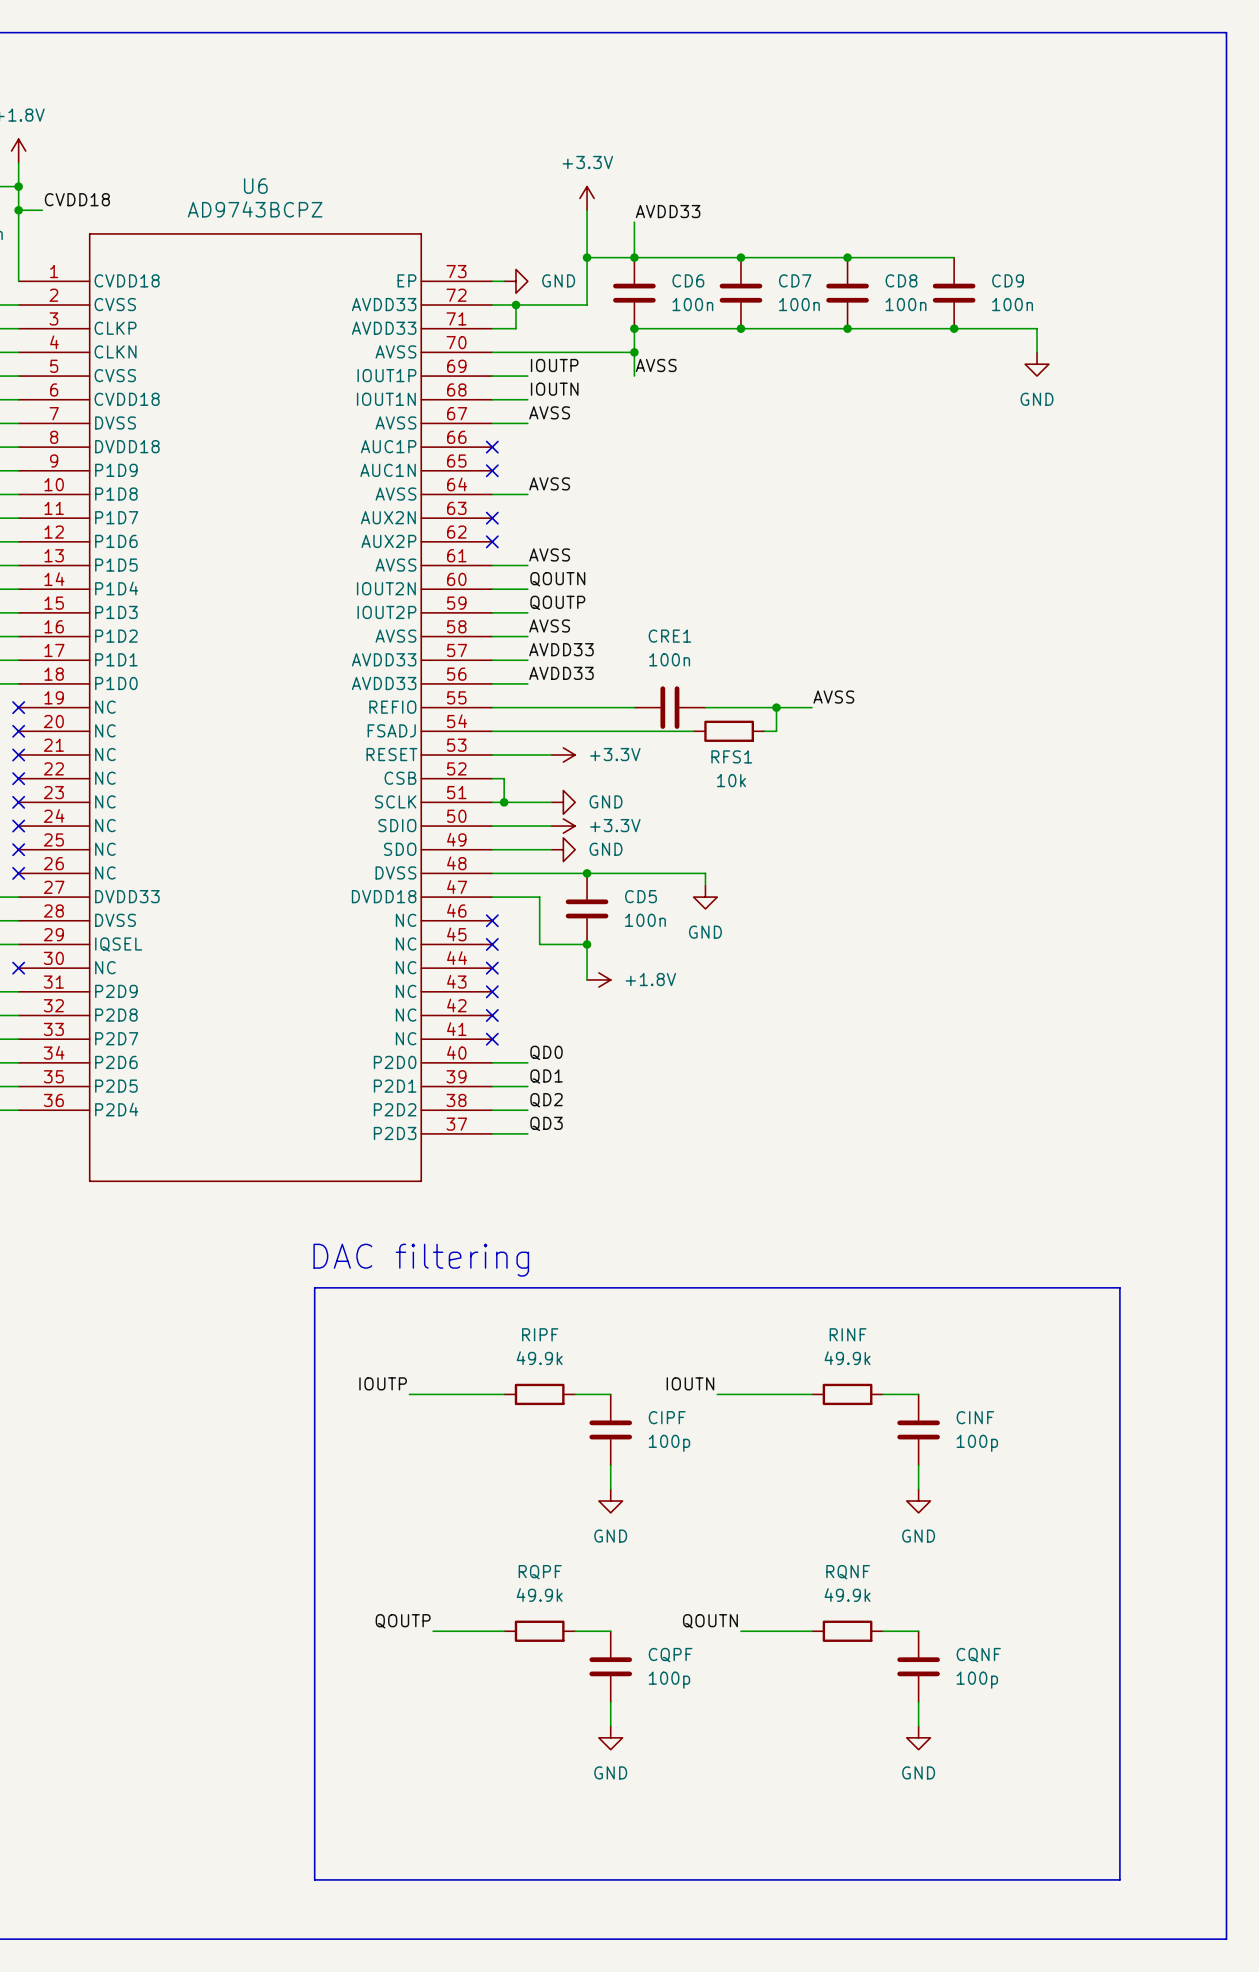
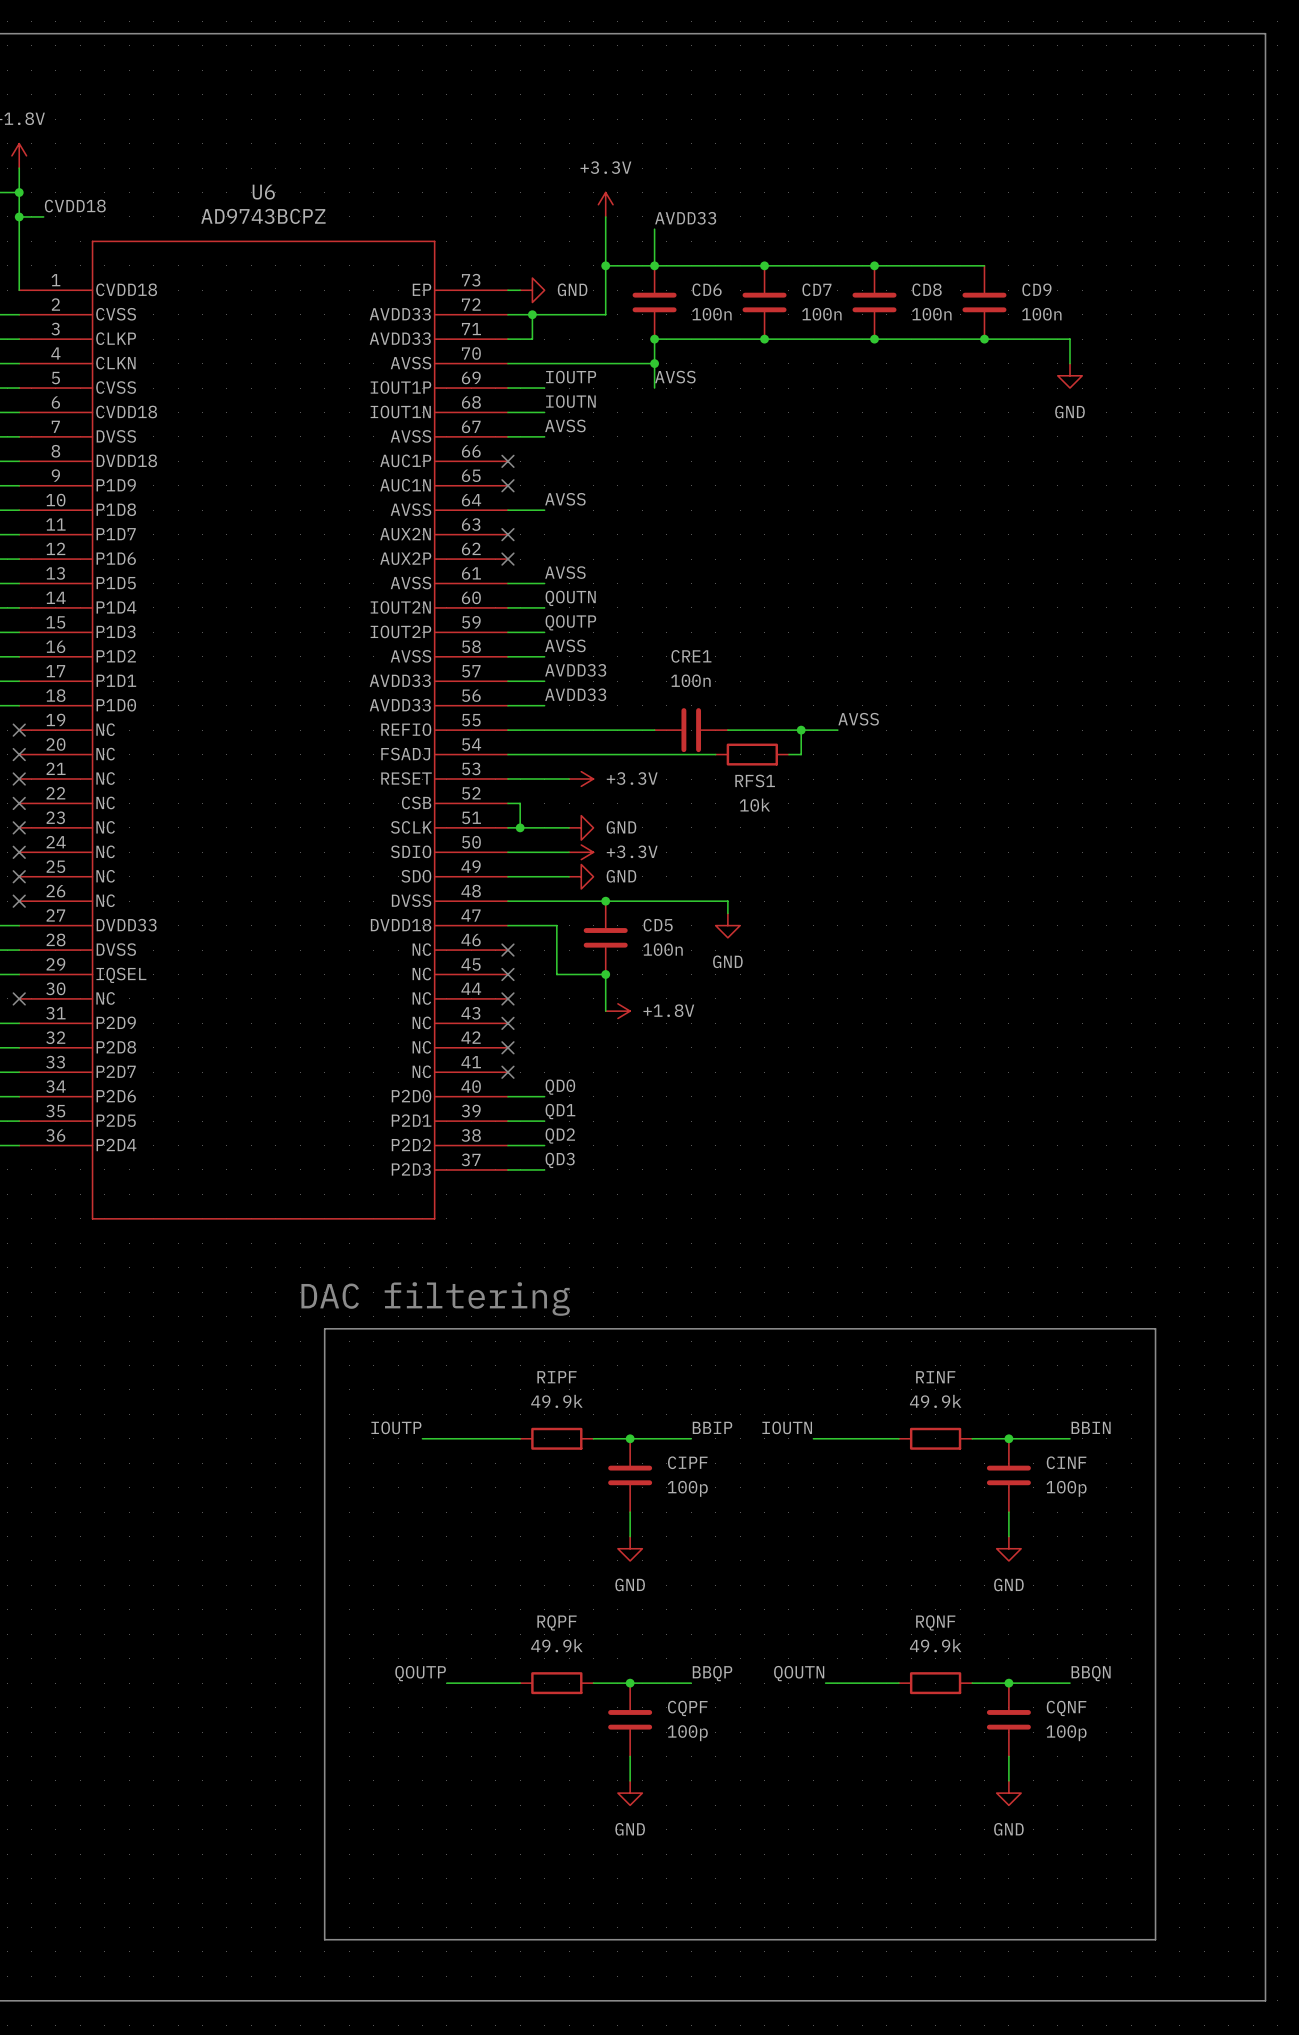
label position: IOUTN (690, 1383) -> IOUTN (787, 1427)
label: none -> BBIP (712, 1427)
label: none -> BBIN (1091, 1427)
wire: none -> (630, 1438) (691, 1438)
junction: none -> (630, 1438)
wire: (717, 1394) (788, 1394) -> none
wire: none -> (837, 1438) (898, 1438)
RINF position: (847, 1394) -> (935, 1438)
wire: (883, 1394) (918, 1394) -> none
wire: none -> (972, 1438) (1070, 1438)
junction: none -> (1008, 1438)
CINF position: (918, 1429) -> (1008, 1475)
wire: (918, 1465) (918, 1489) -> (1008, 1512) (1008, 1536)
power symbol position: GND (918, 1501) -> GND (1008, 1548)
label: none -> BBQP (712, 1673)
label position: QOUTN (710, 1621) -> QOUTN (799, 1673)
label: none -> BBQN (1091, 1673)
wire: none -> (630, 1683) (691, 1683)
junction: none -> (630, 1683)
wire: (740, 1631) (800, 1631) -> (837, 1683) (898, 1683)
RQNF position: (847, 1631) -> (935, 1683)
wire: (883, 1631) (918, 1631) -> none
wire: none -> (972, 1683) (1070, 1683)
junction: none -> (1008, 1683)
CQNF position: (918, 1666) -> (1008, 1719)
wire: (918, 1702) (918, 1725) -> (1008, 1756) (1008, 1780)
power symbol position: GND (918, 1737) -> GND (1008, 1793)

